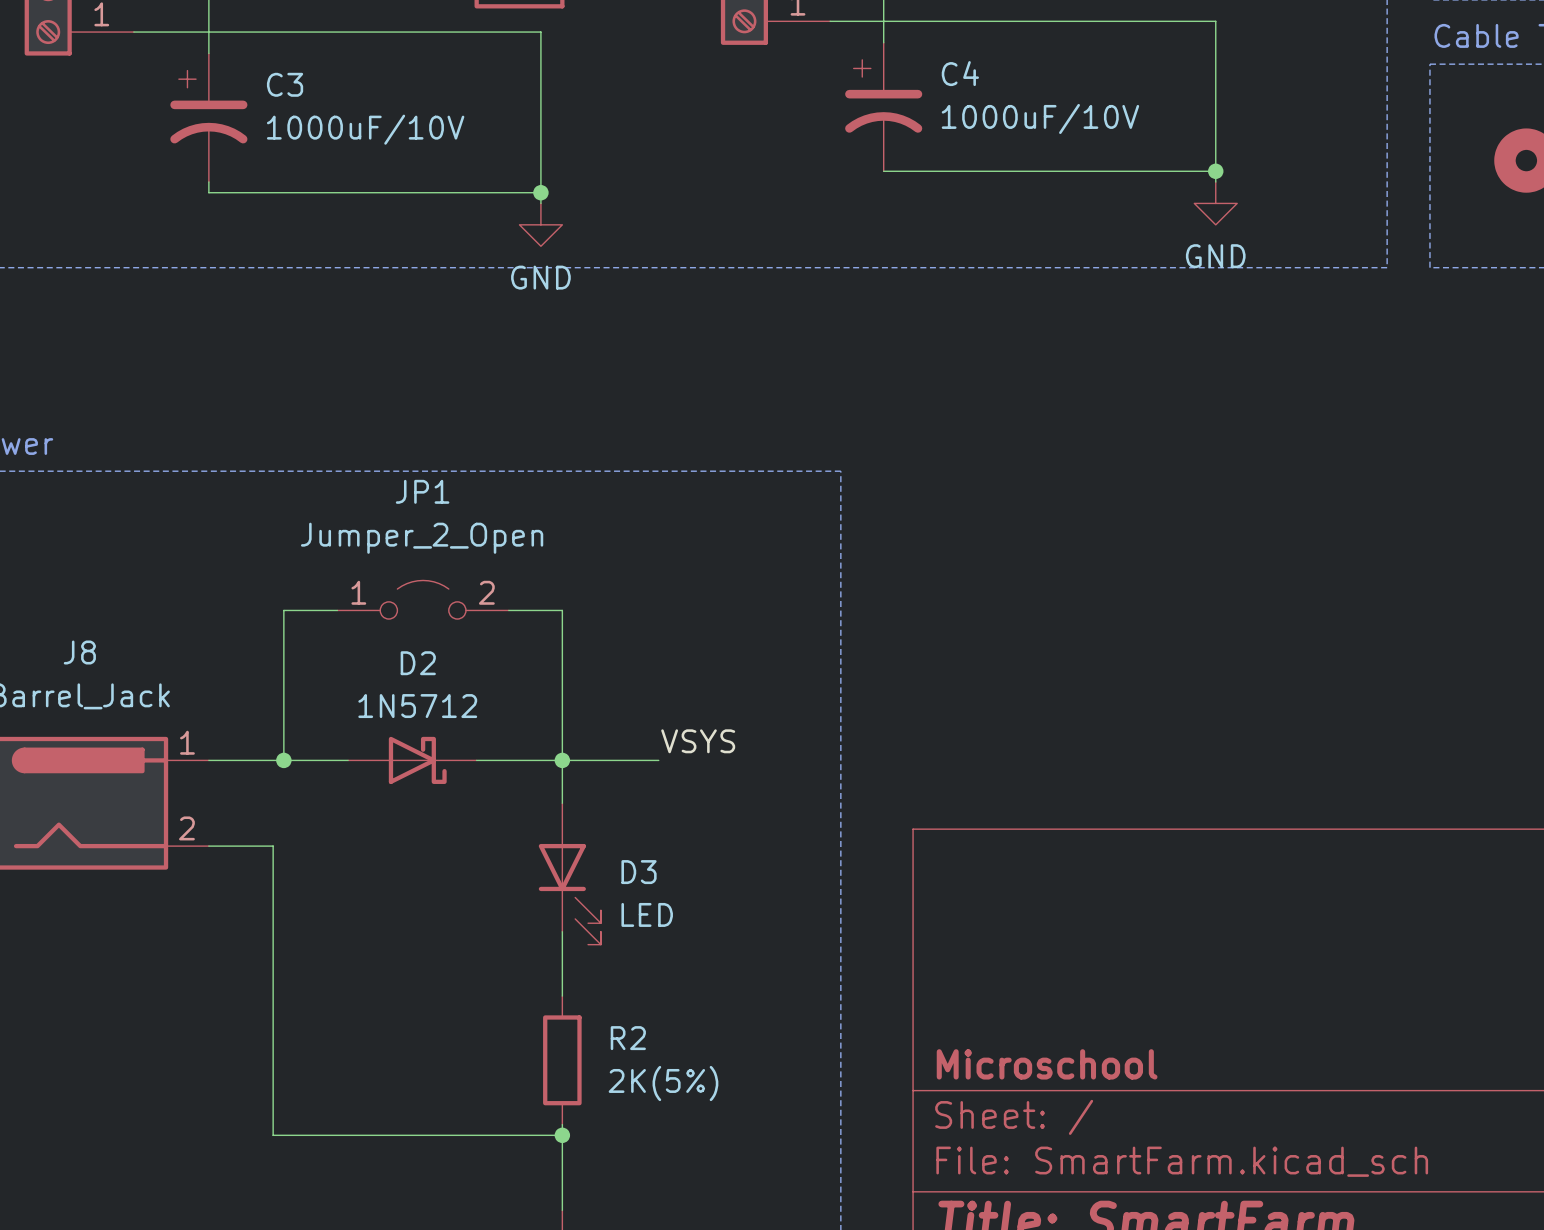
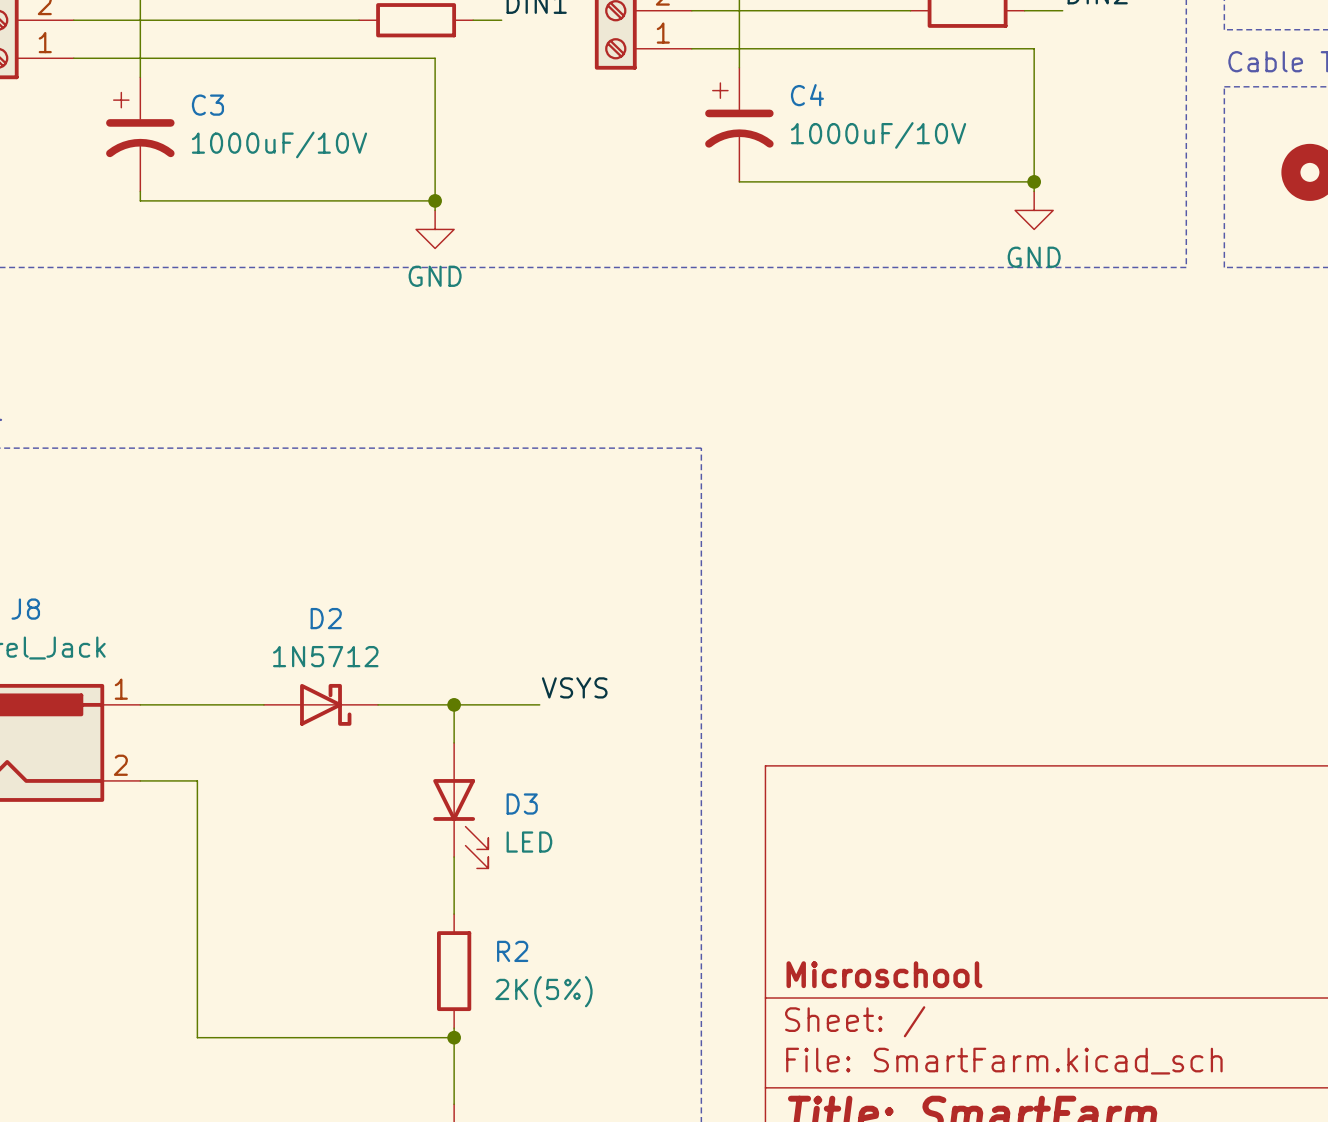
JP1: Jumper_2_Open (423, 599) -> none
wire: (337, 610) (283, 610) (283, 760) -> none
wire: (508, 610) (562, 610) (562, 760) -> none
junction: (283, 760) -> none

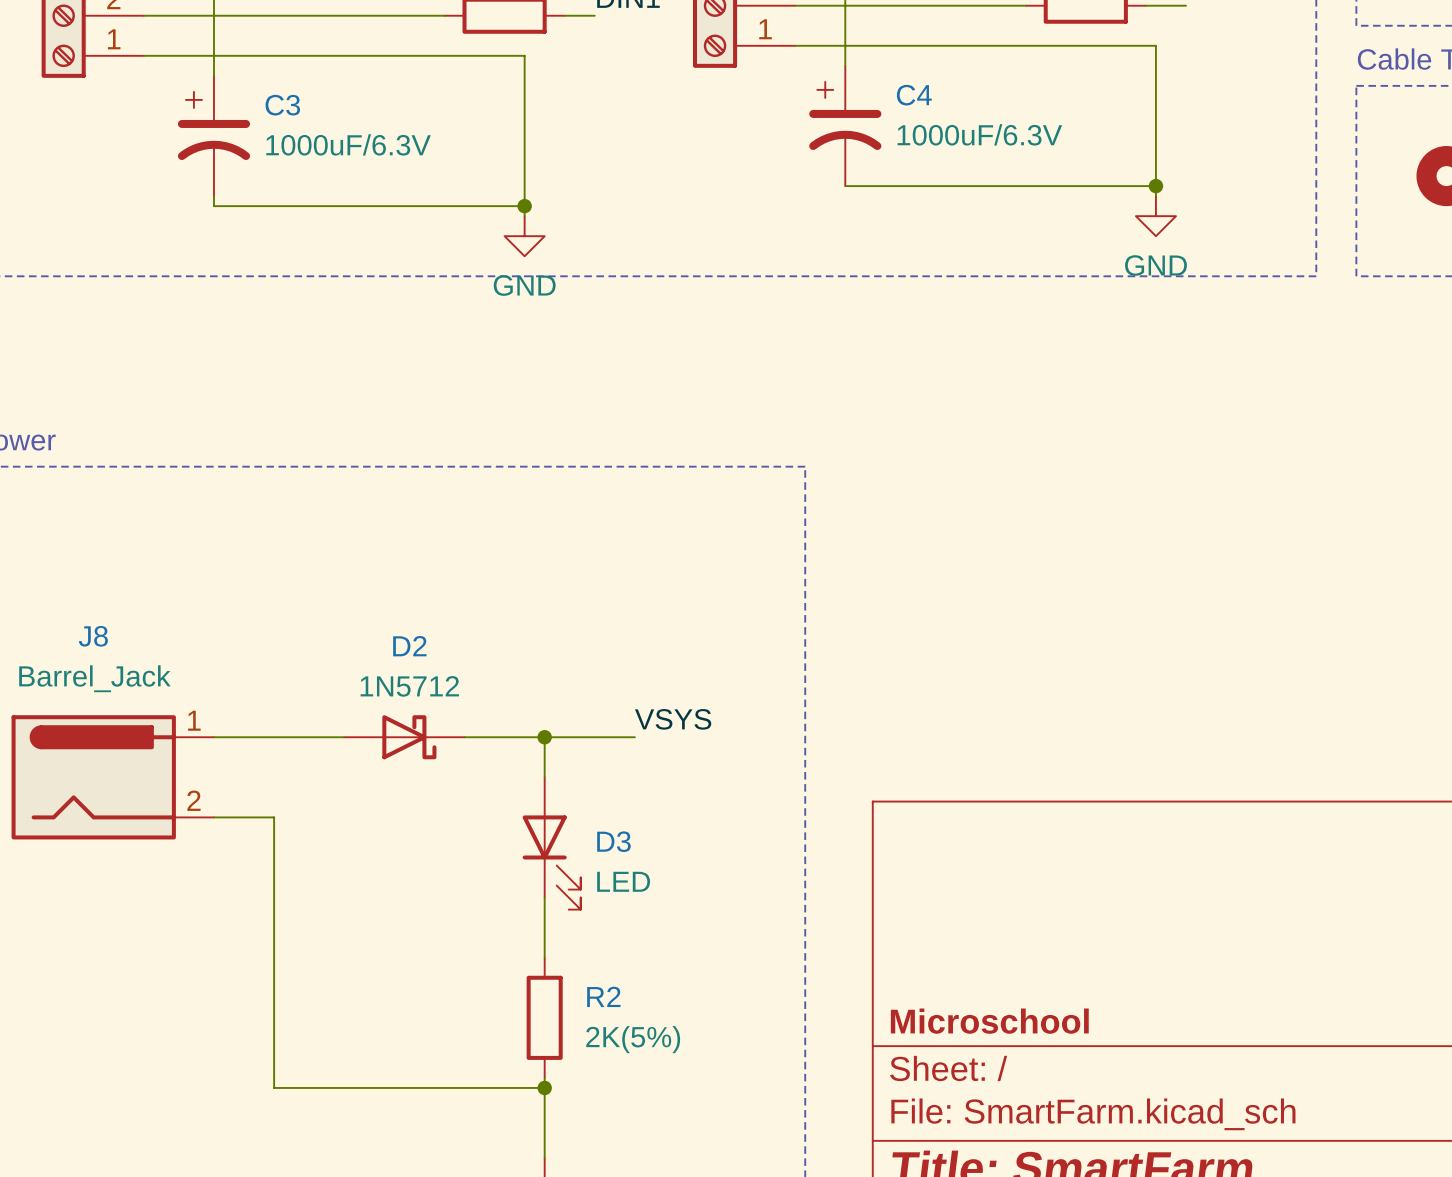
C4 value: 1000uF/10V (878, 135) -> 1000uF/6.3V (979, 134)
C3 value: 1000uF/10V (279, 144) -> 1000uF/6.3V (348, 144)

